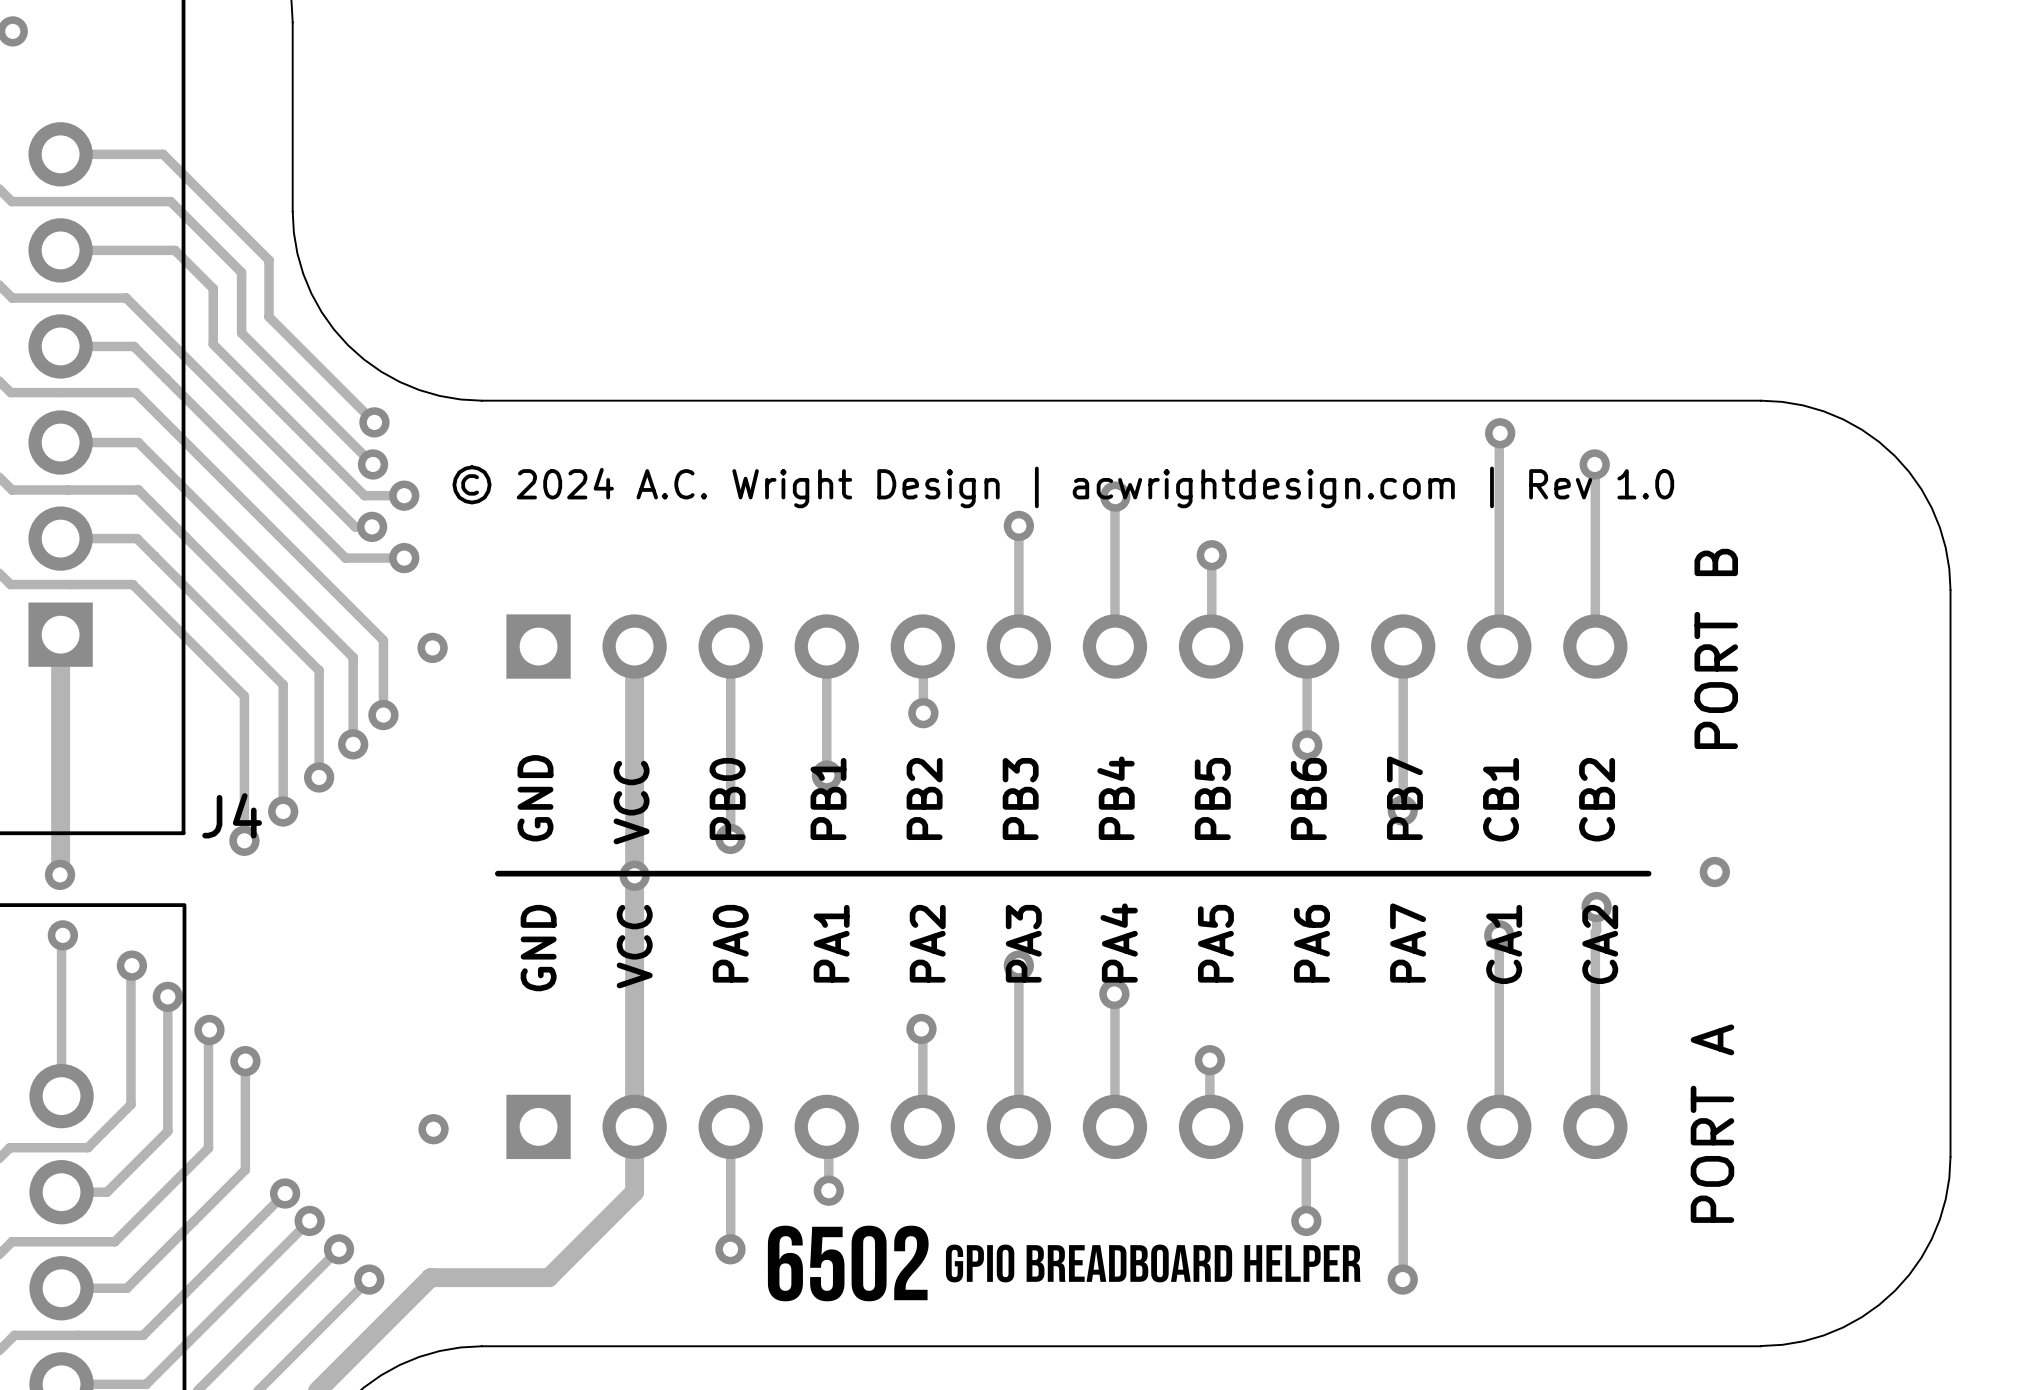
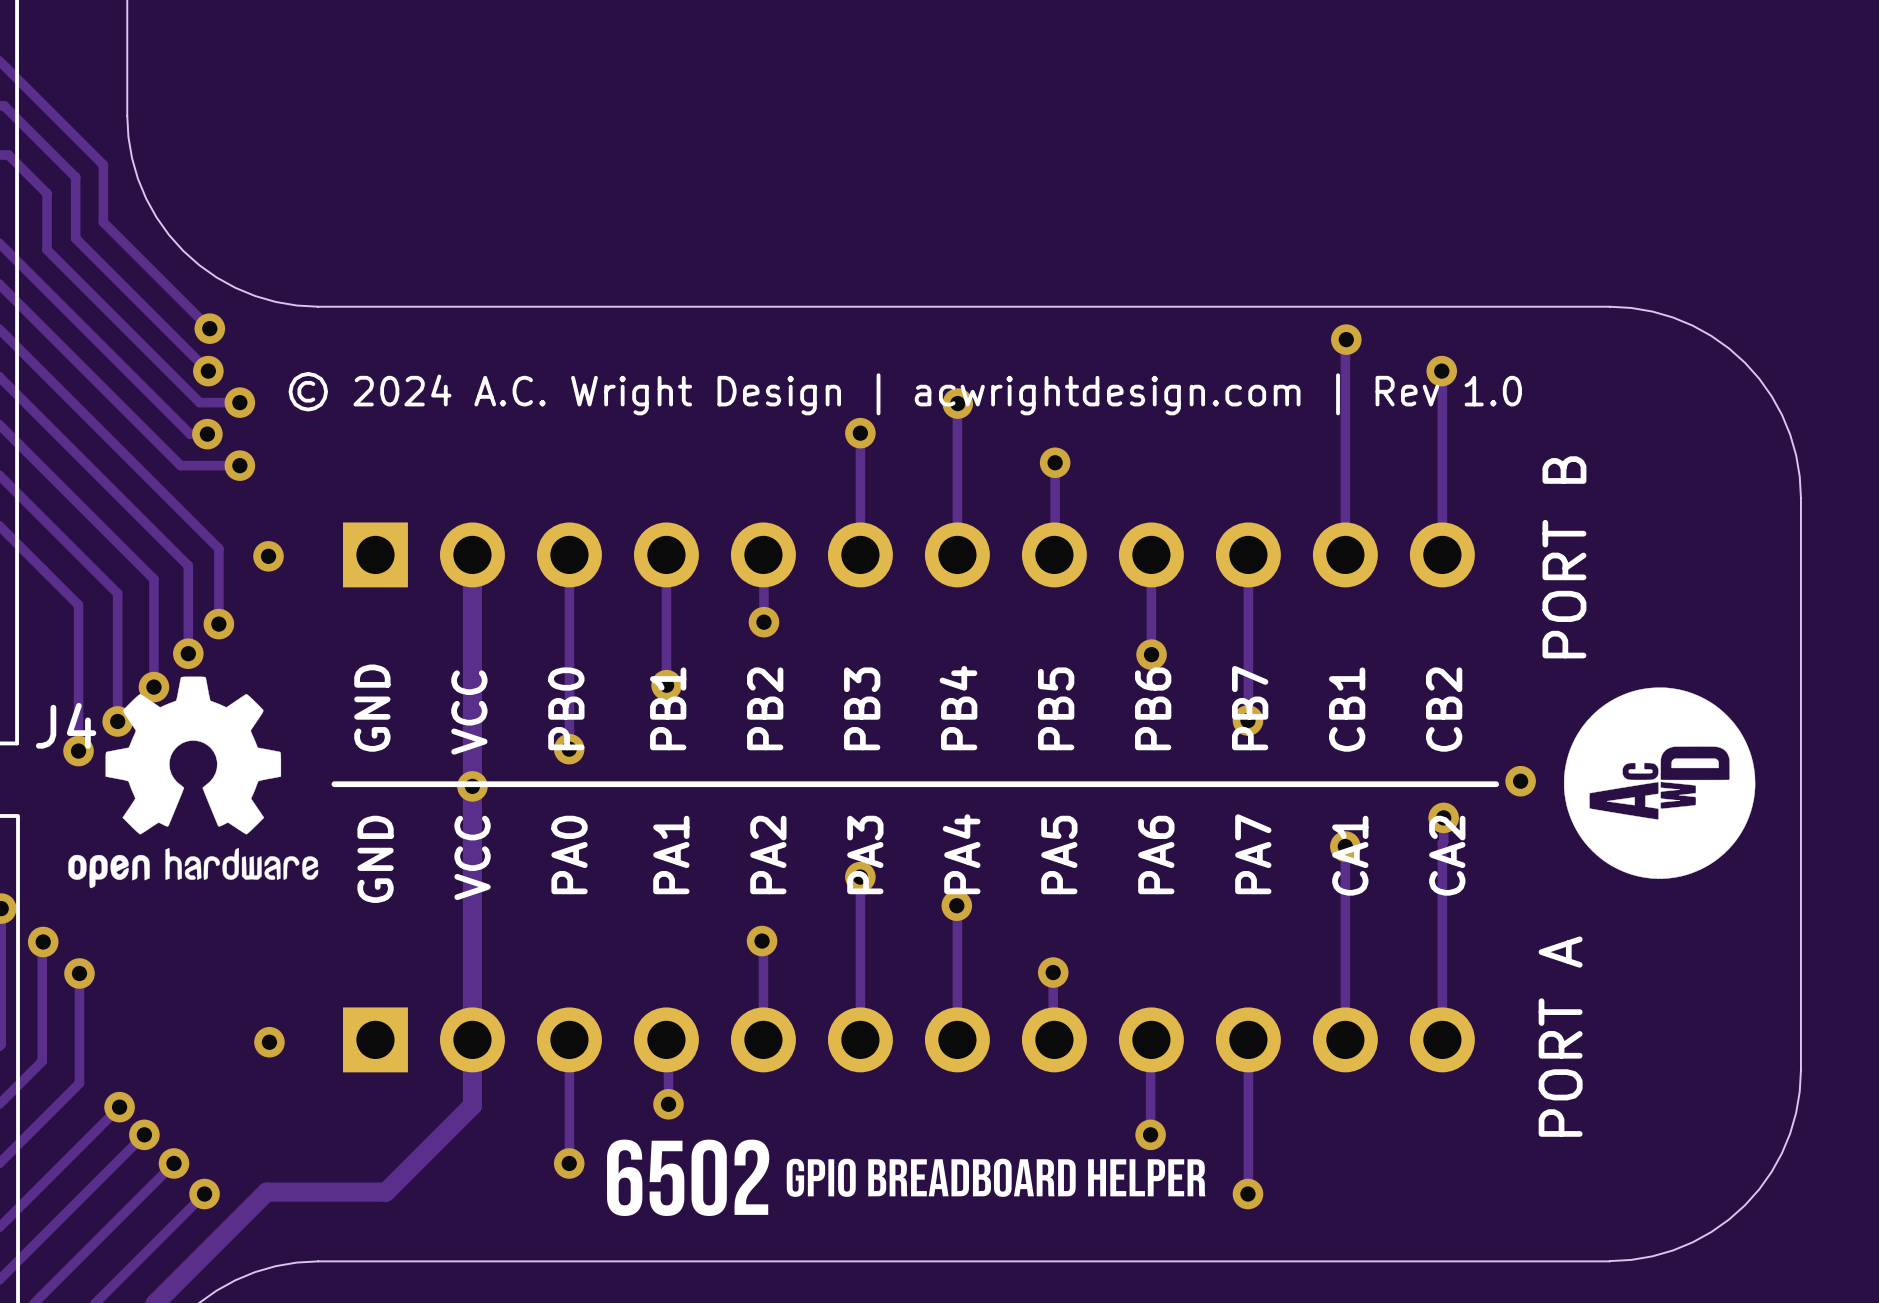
drawing: none -> [68, 676, 319, 889]
drawing: none -> [1563, 687, 1756, 879]
via position: (1714, 872) -> (1520, 781)

